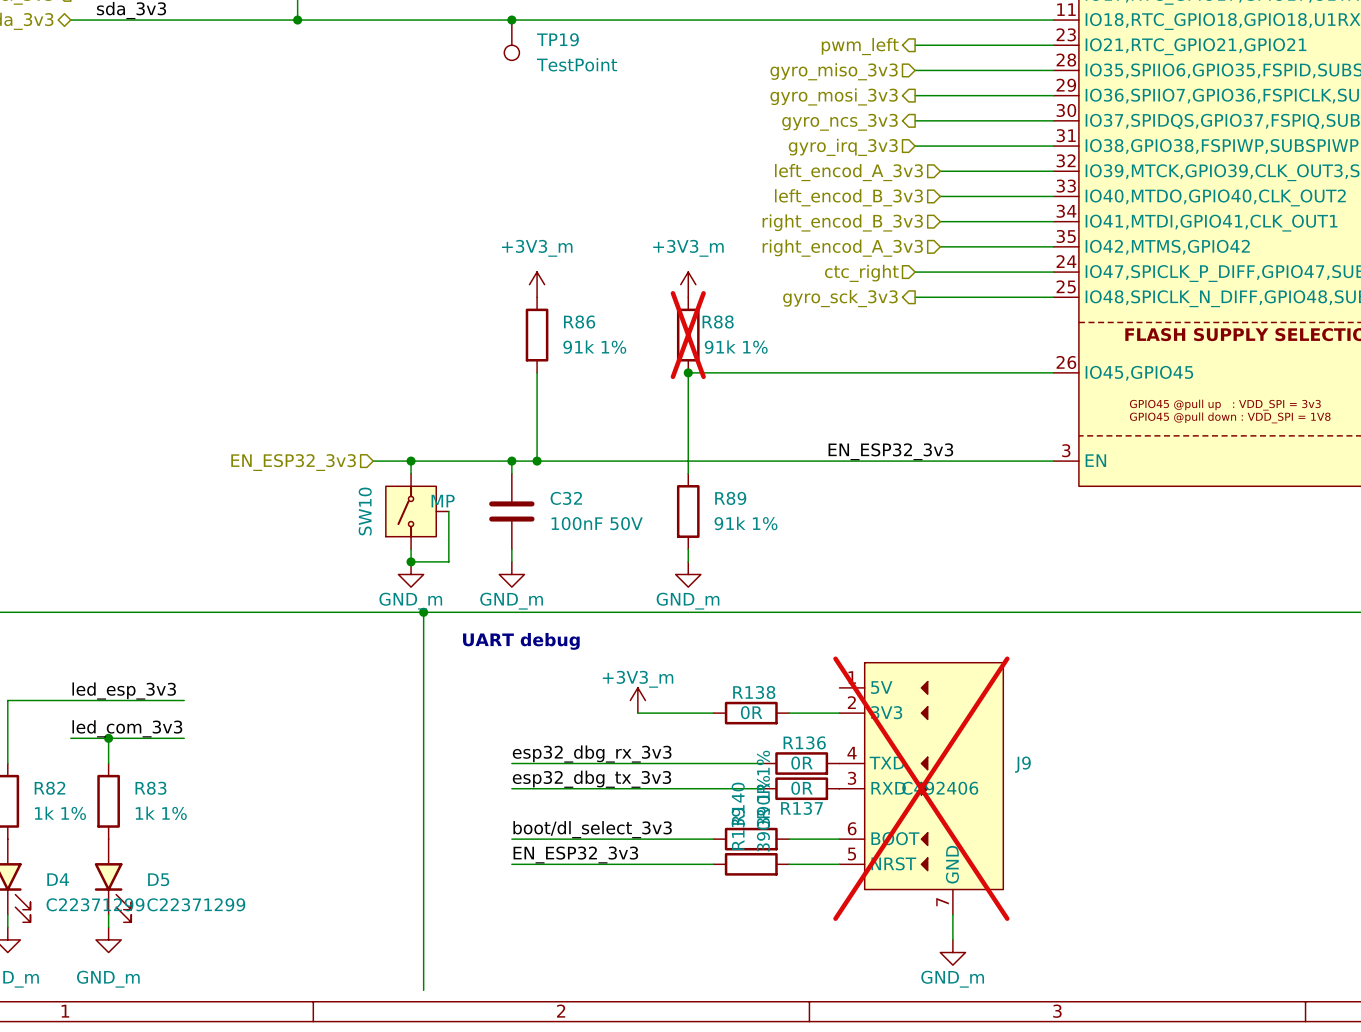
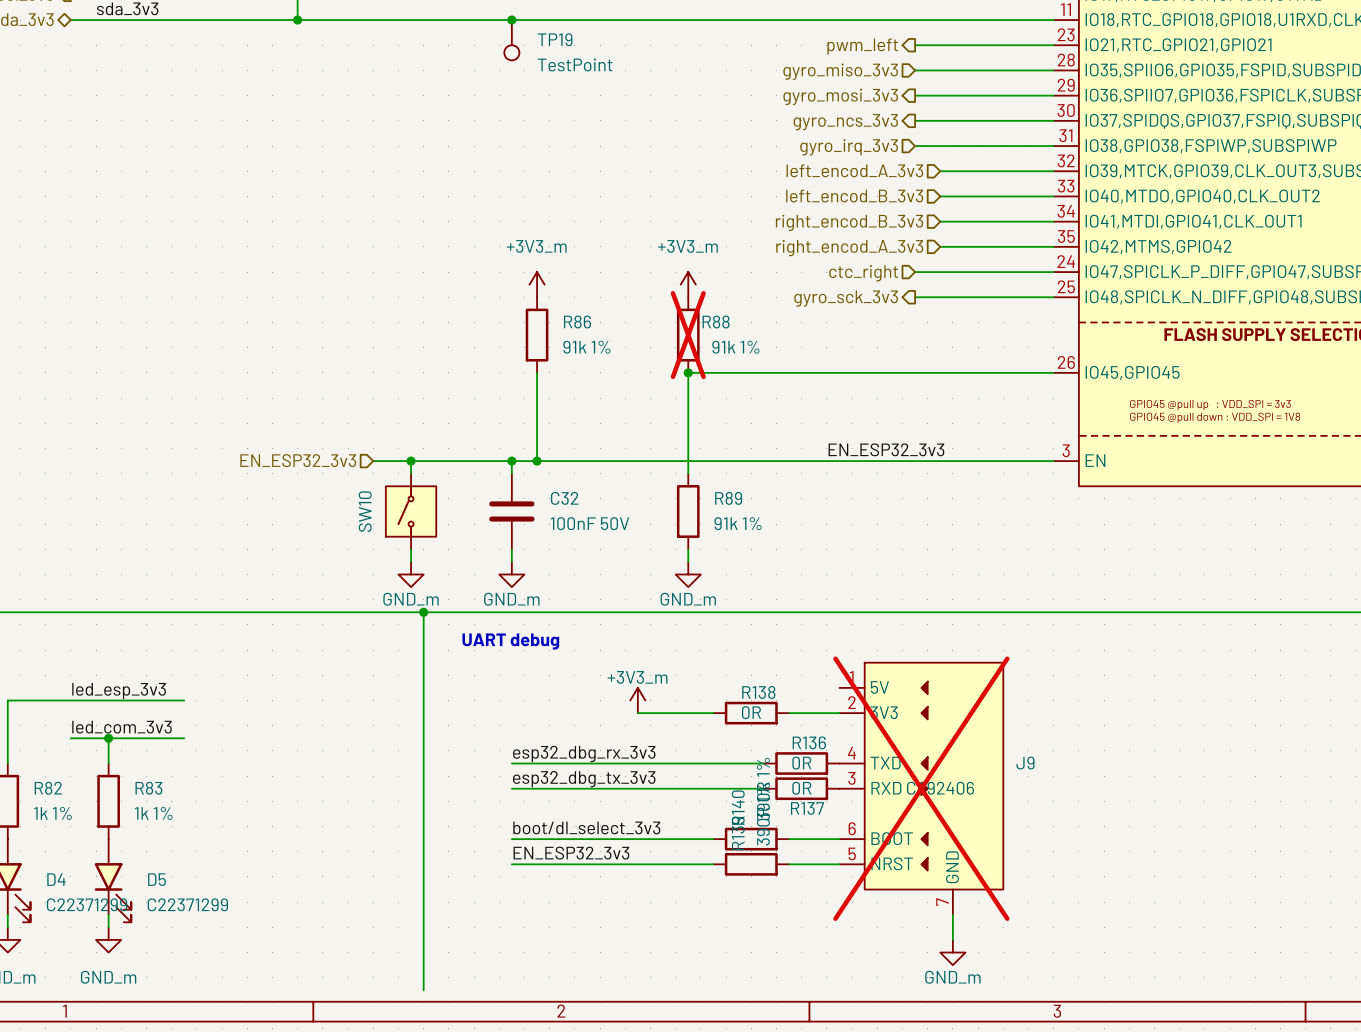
SW10 symbol: [385, 473, 449, 550] -> [385, 473, 437, 550]
wire: (448, 511) (448, 561) (411, 561) -> none
junction: (411, 561) -> none

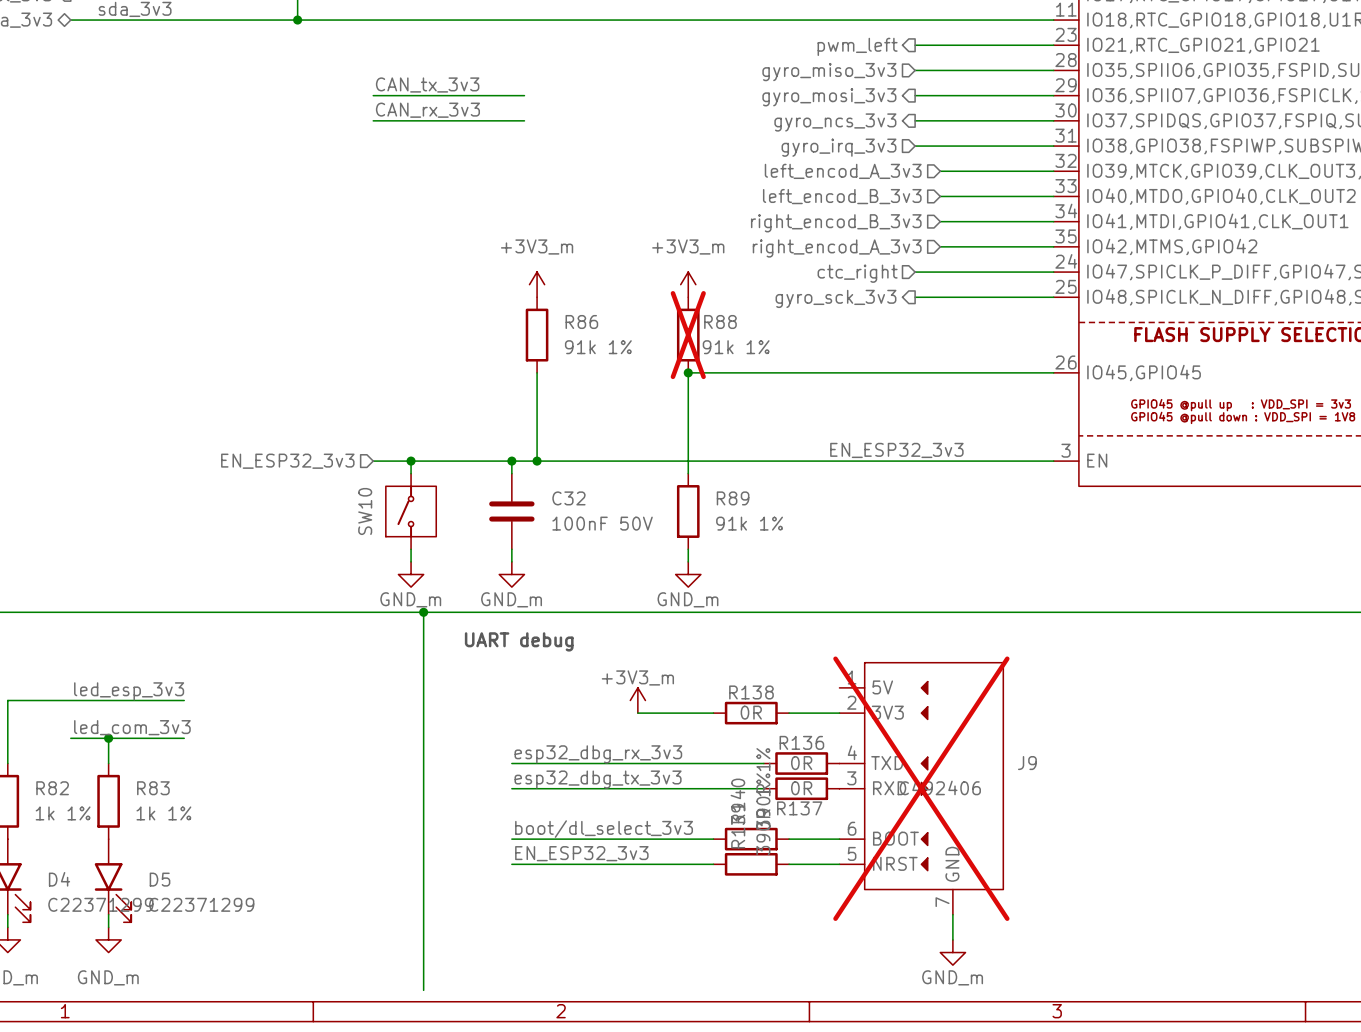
junction: (511, 20) -> none
TP19: TestPoint (511, 40) -> none
label: none -> CAN_tx_3v3 (427, 85)
wire: none -> (373, 95) (524, 95)
label: none -> CAN_rx_3v3 (427, 110)
wire: none -> (373, 120) (524, 120)

